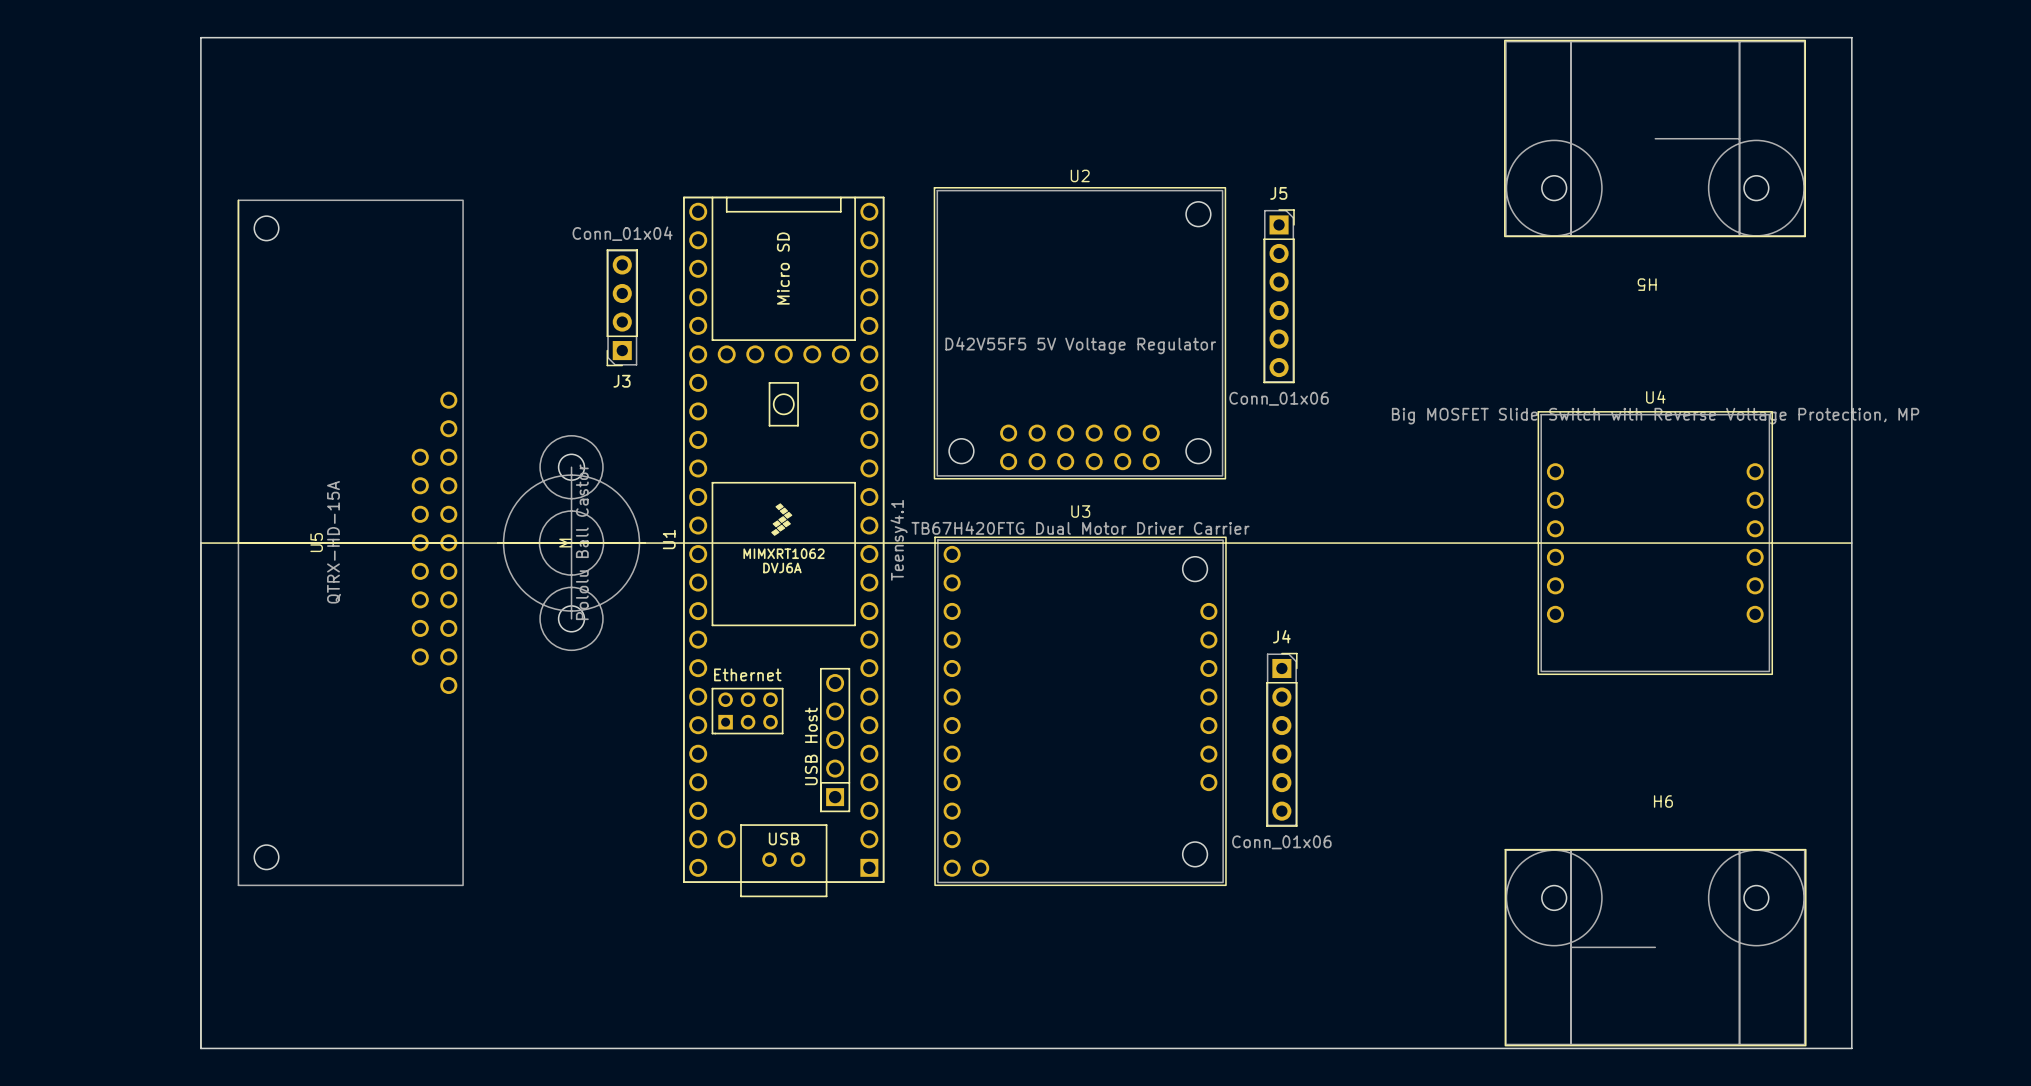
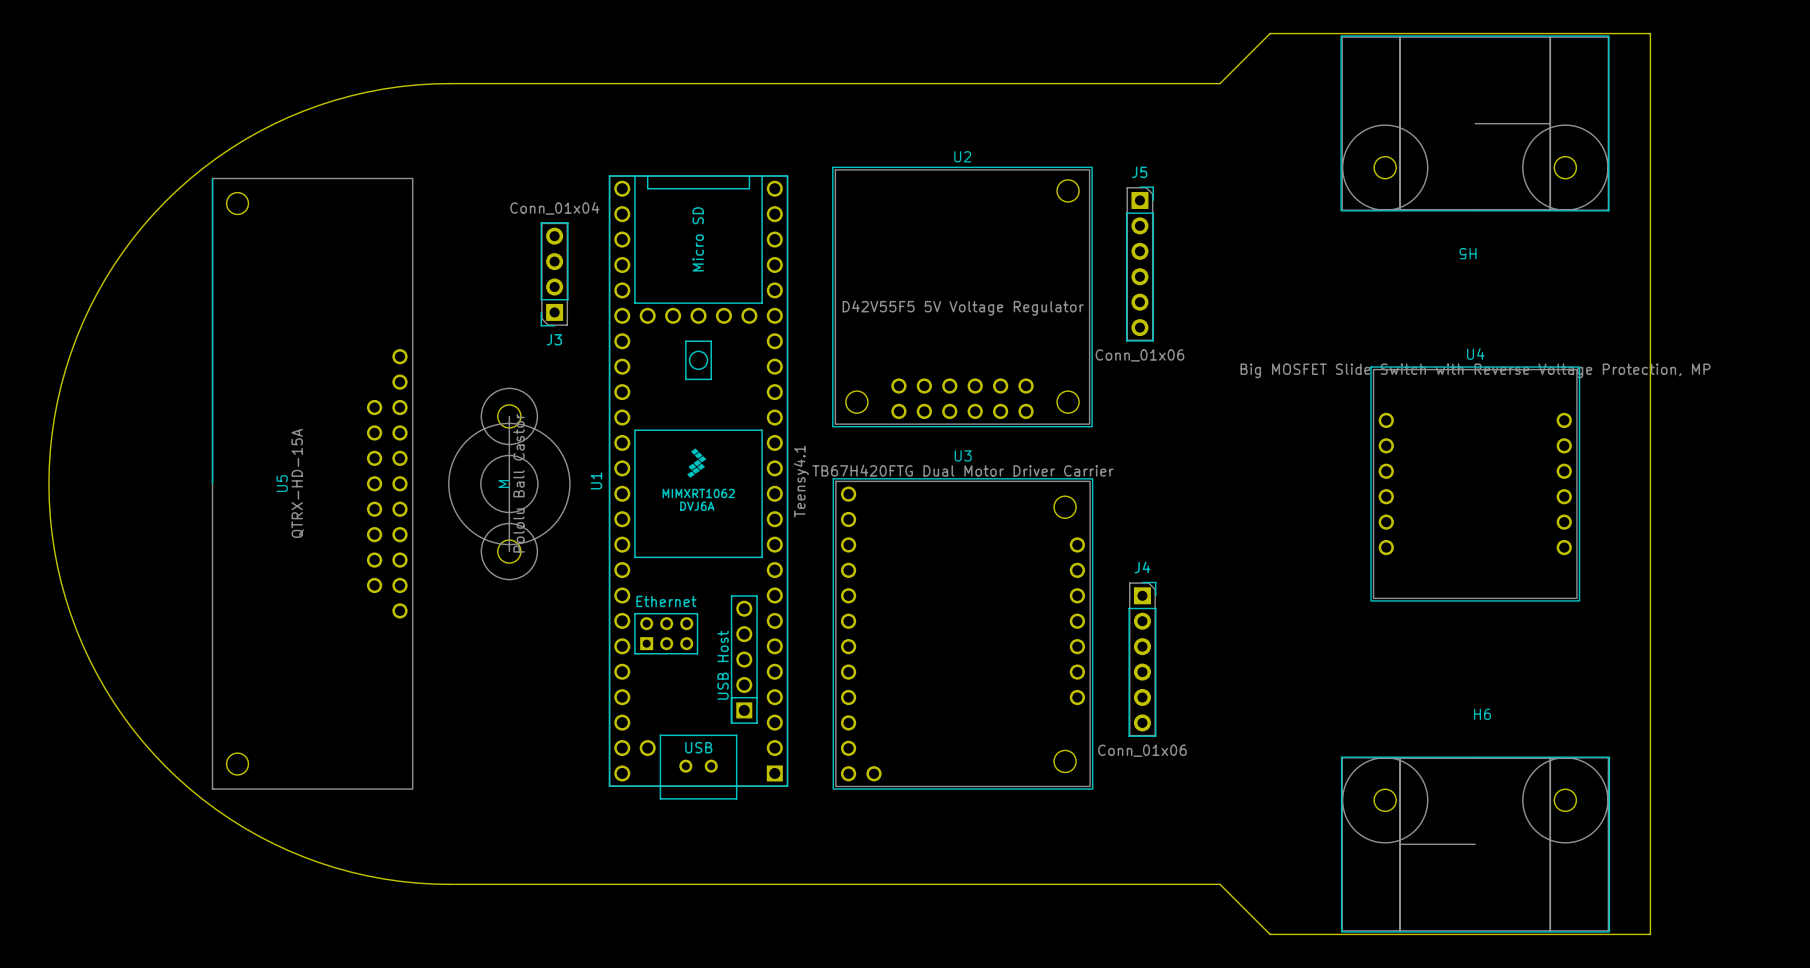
board edge: (1425, 37) (200, 37) (200, 1048) (1425, 1048) -> (1270, 33) (1220, 83) (432, 83) (367, 92) (303, 111) (244, 140) (190, 178) (143, 225) (114, 265) (89, 308) (65, 369) (54, 418) (48, 483) (54, 549) (70, 613) (97, 674) (123, 716) (154, 755) (203, 799) (244, 827) (303, 856) (367, 875) (432, 884) (1220, 884) (1270, 934)
U5 footprint: [237, 199, 464, 886] -> [212, 178, 414, 790]
M footprint: [497, 435, 646, 651] -> [448, 387, 571, 581]
line: (1851, 543) (200, 543) (200, 1048) -> none

